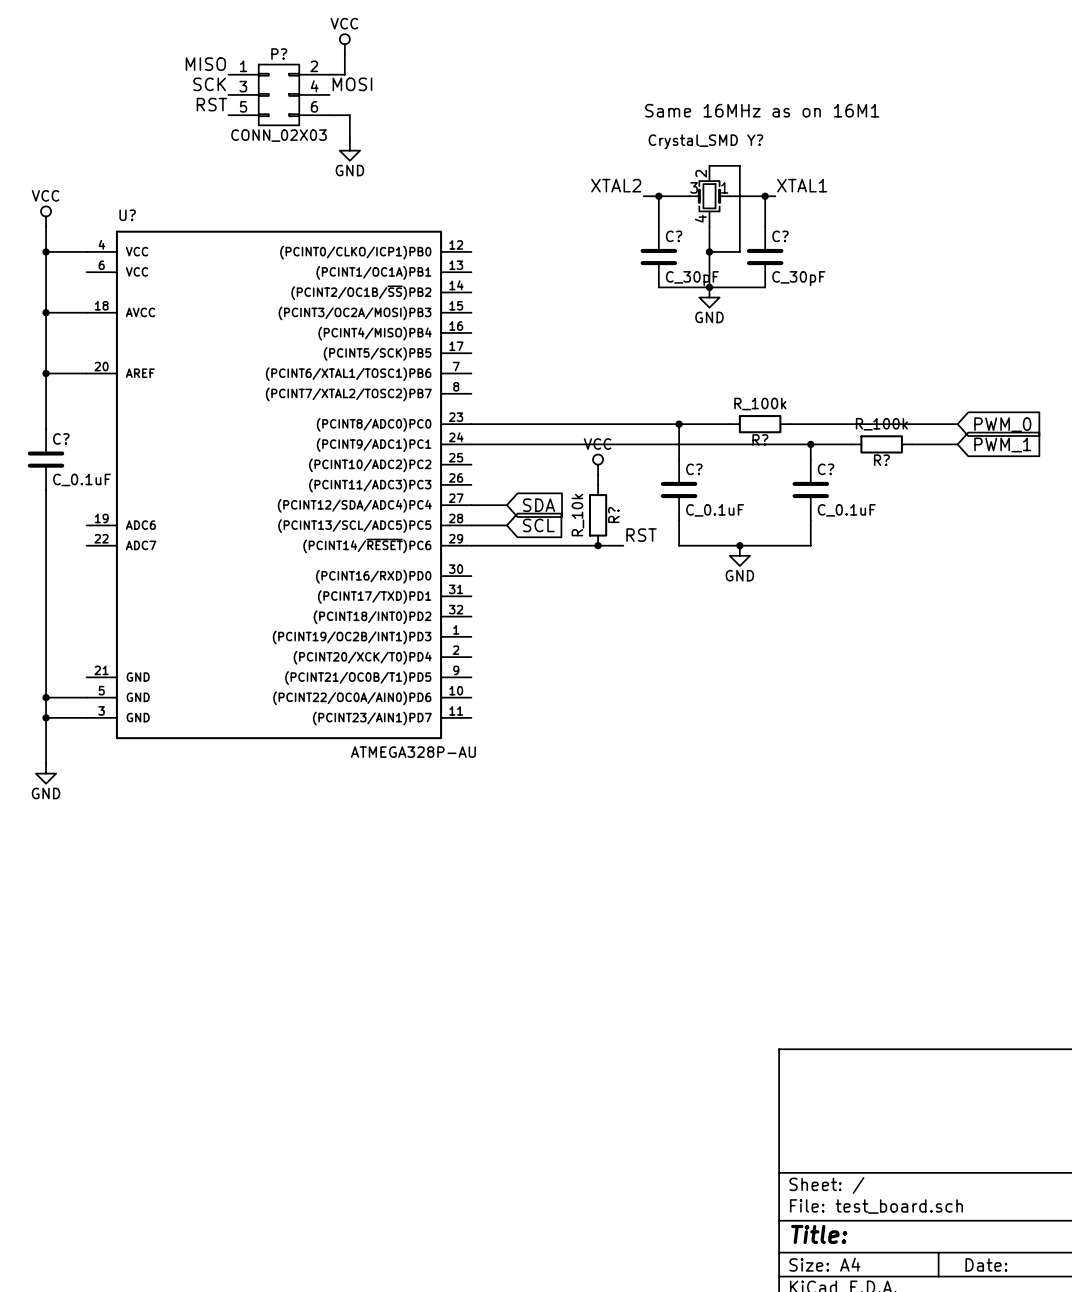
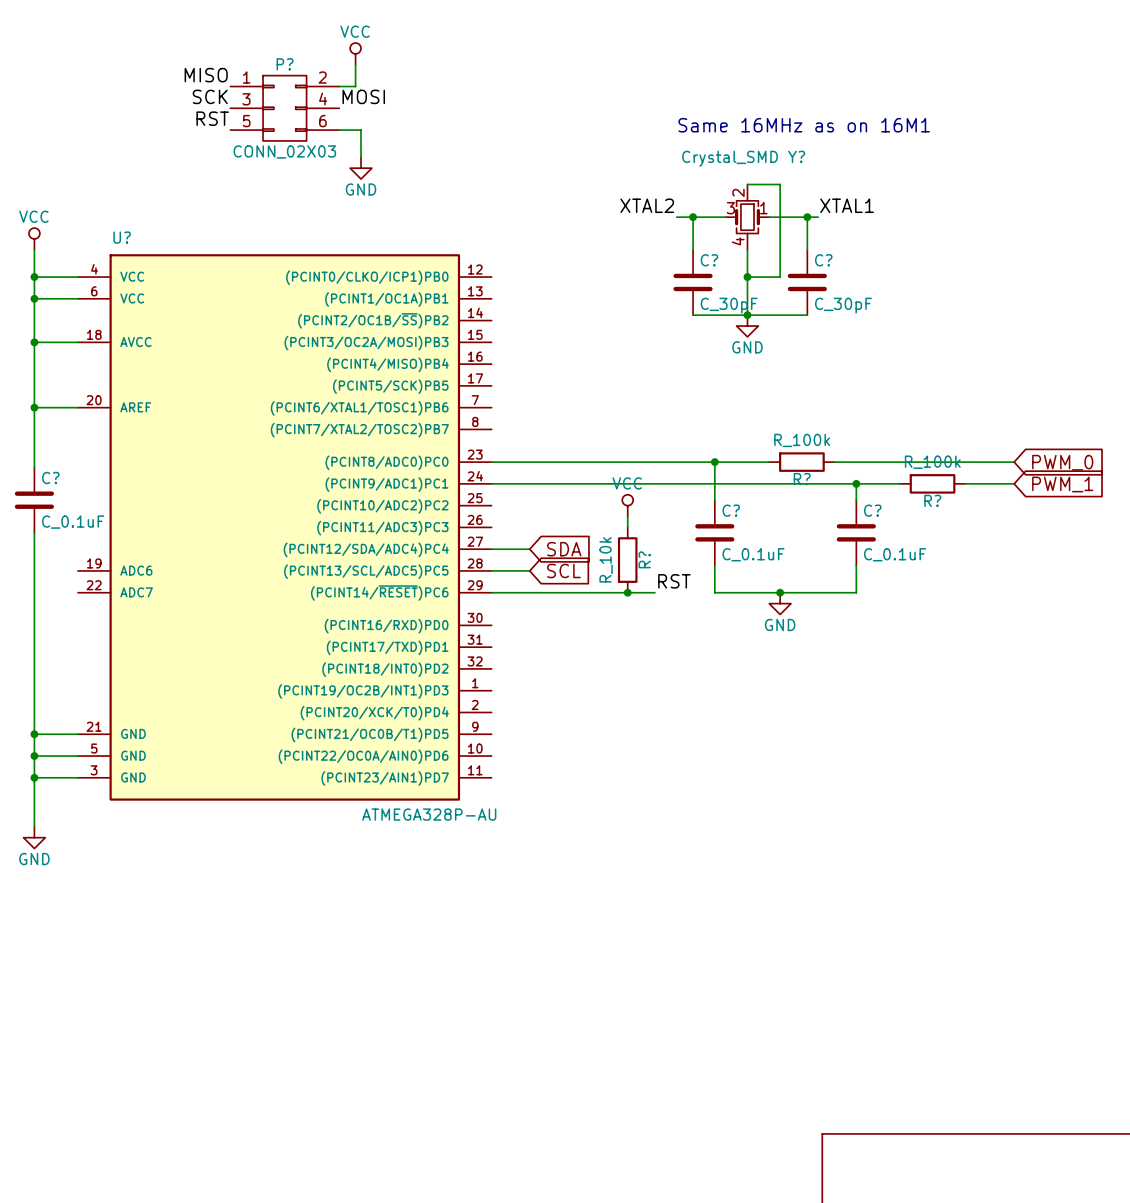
wire: none -> (34, 298) (77, 298)
junction: none -> (34, 298)
wire: none -> (34, 734) (77, 734)
junction: none -> (34, 734)

